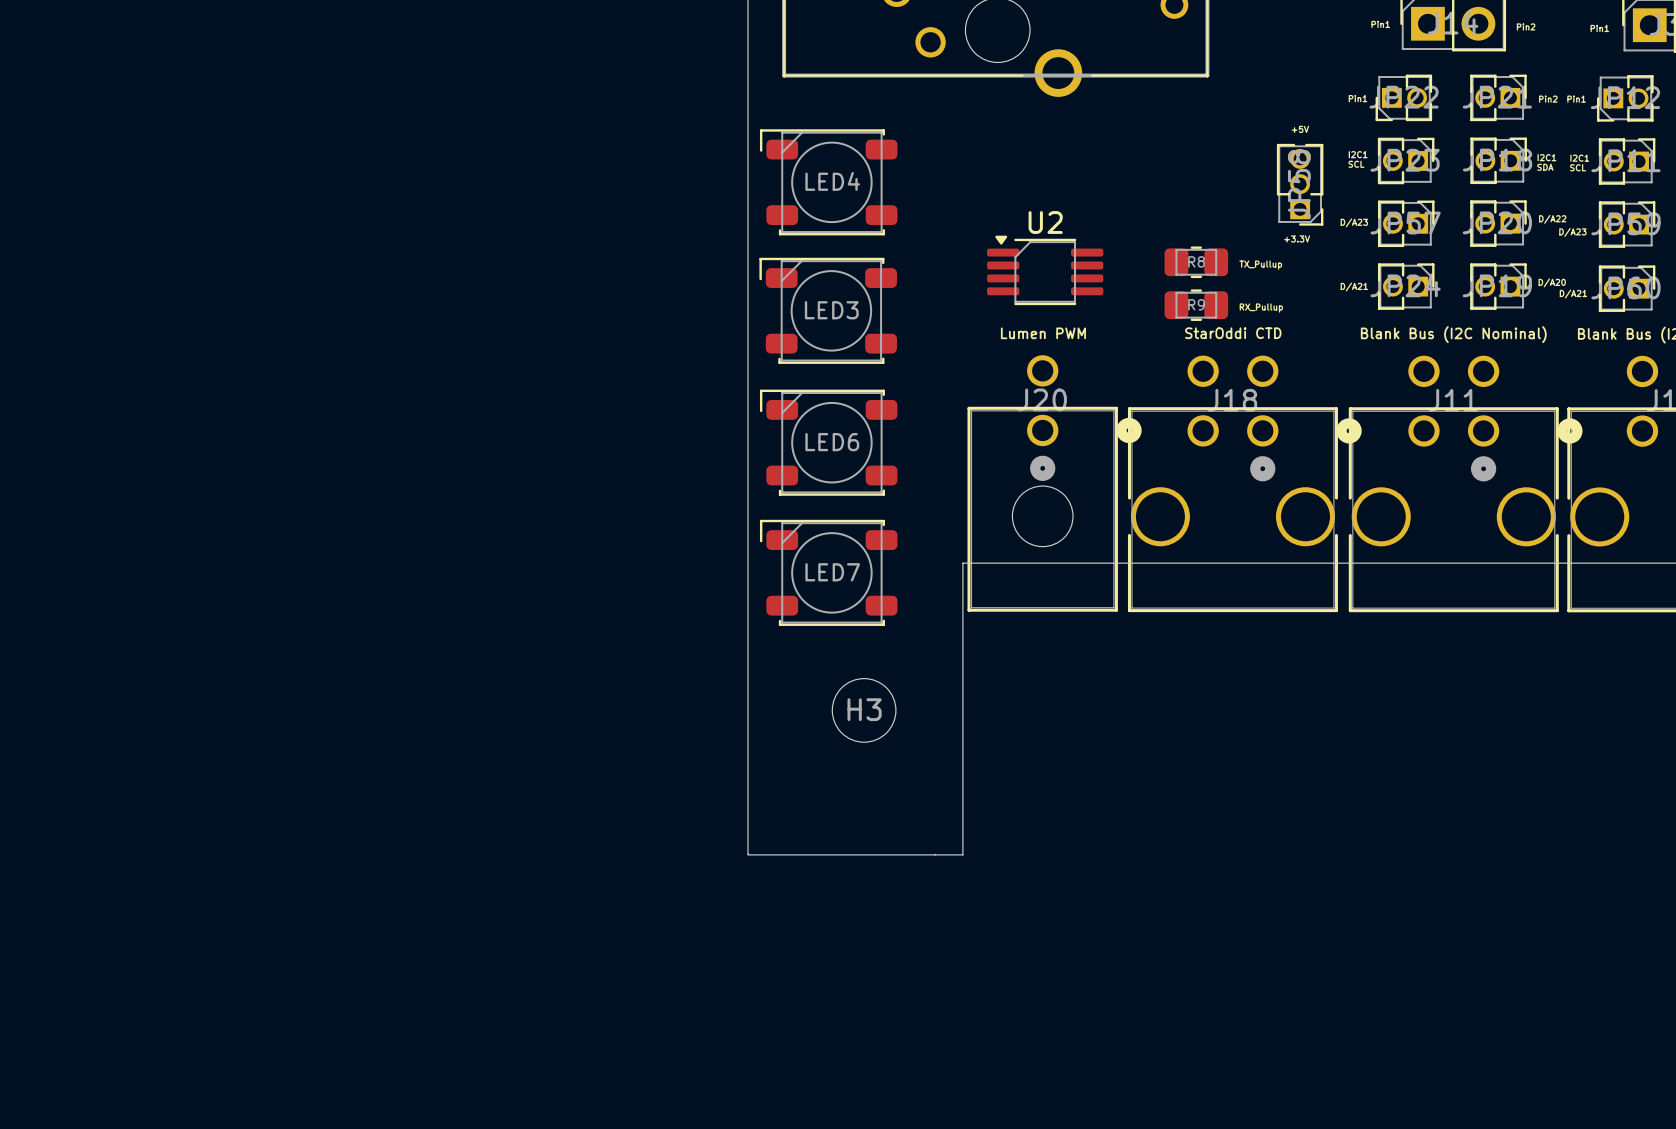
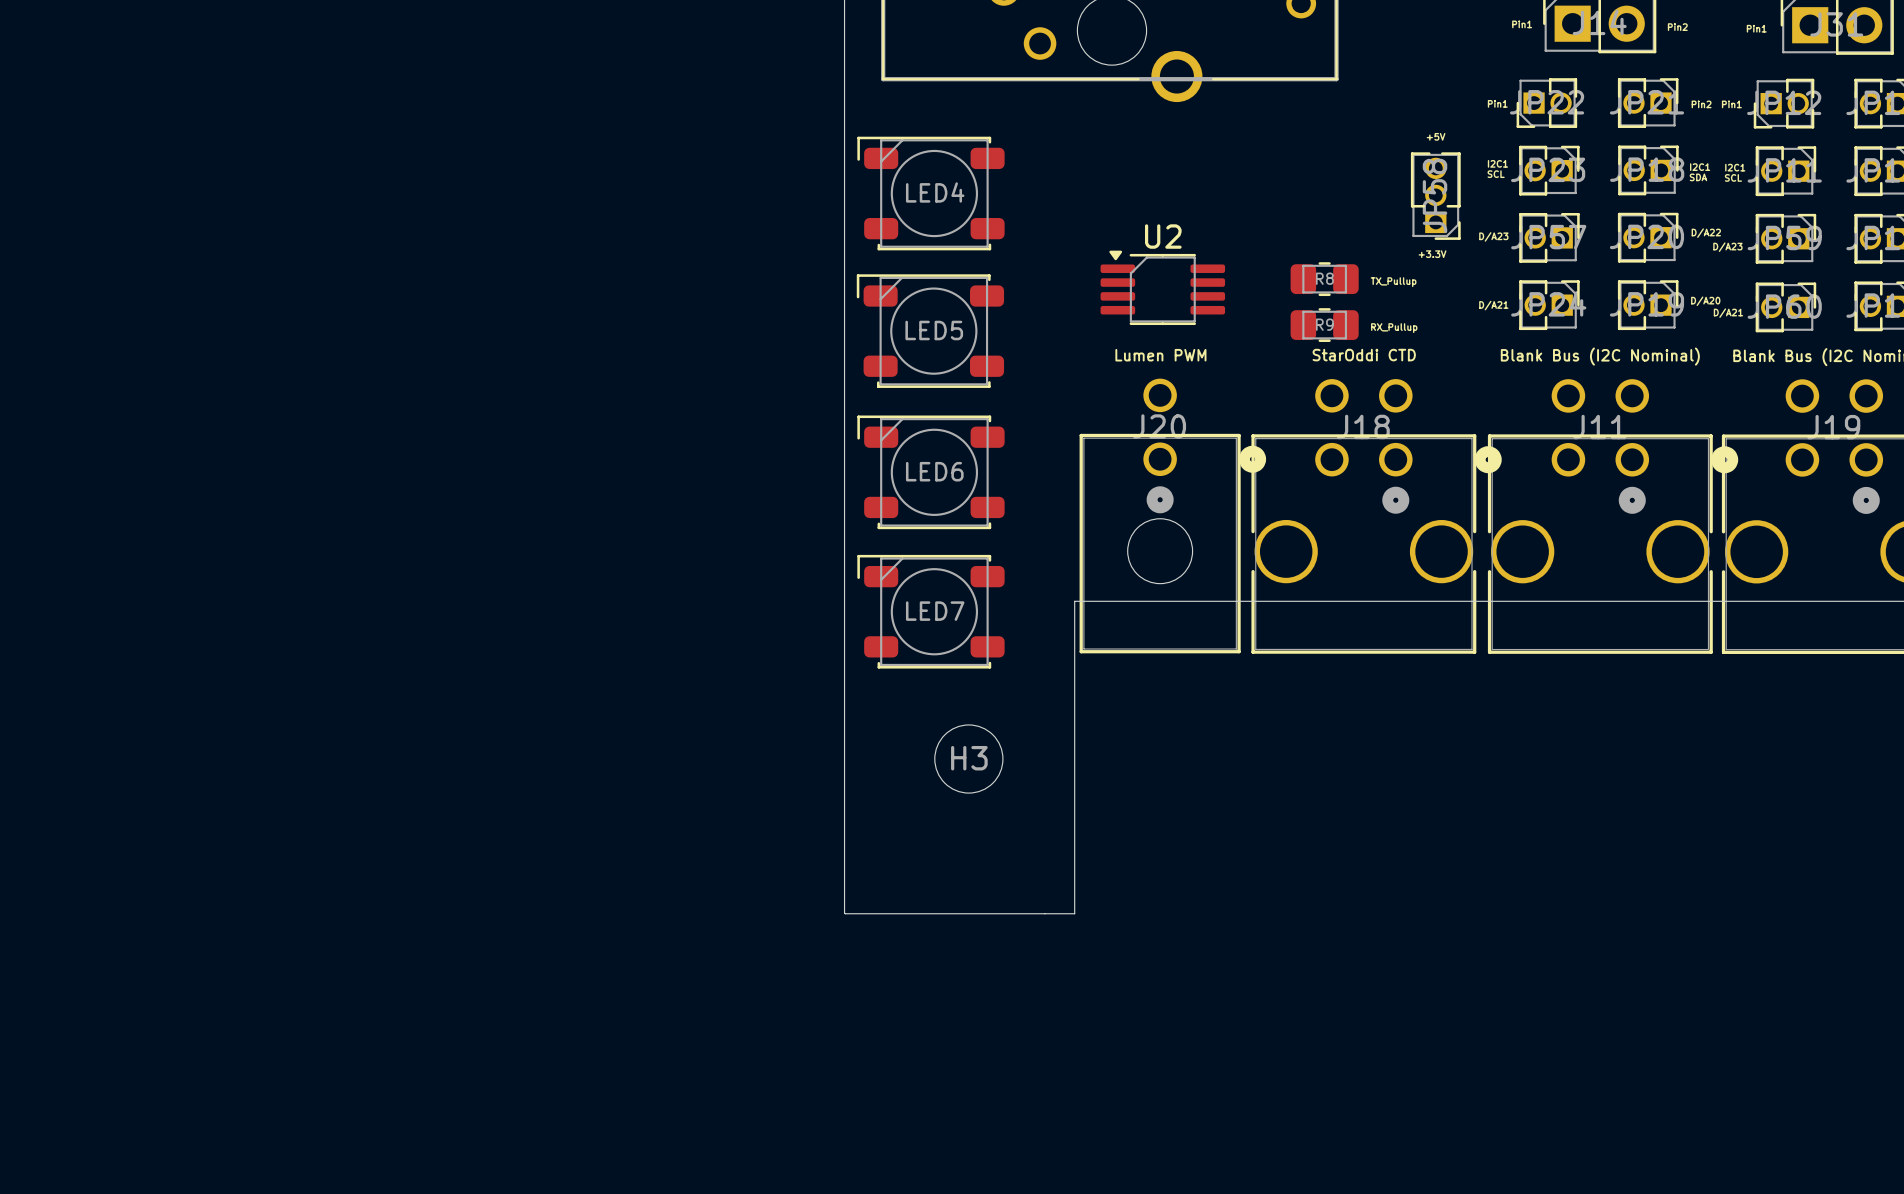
LED3 name: LED3 (831, 310) -> LED5 (934, 330)

